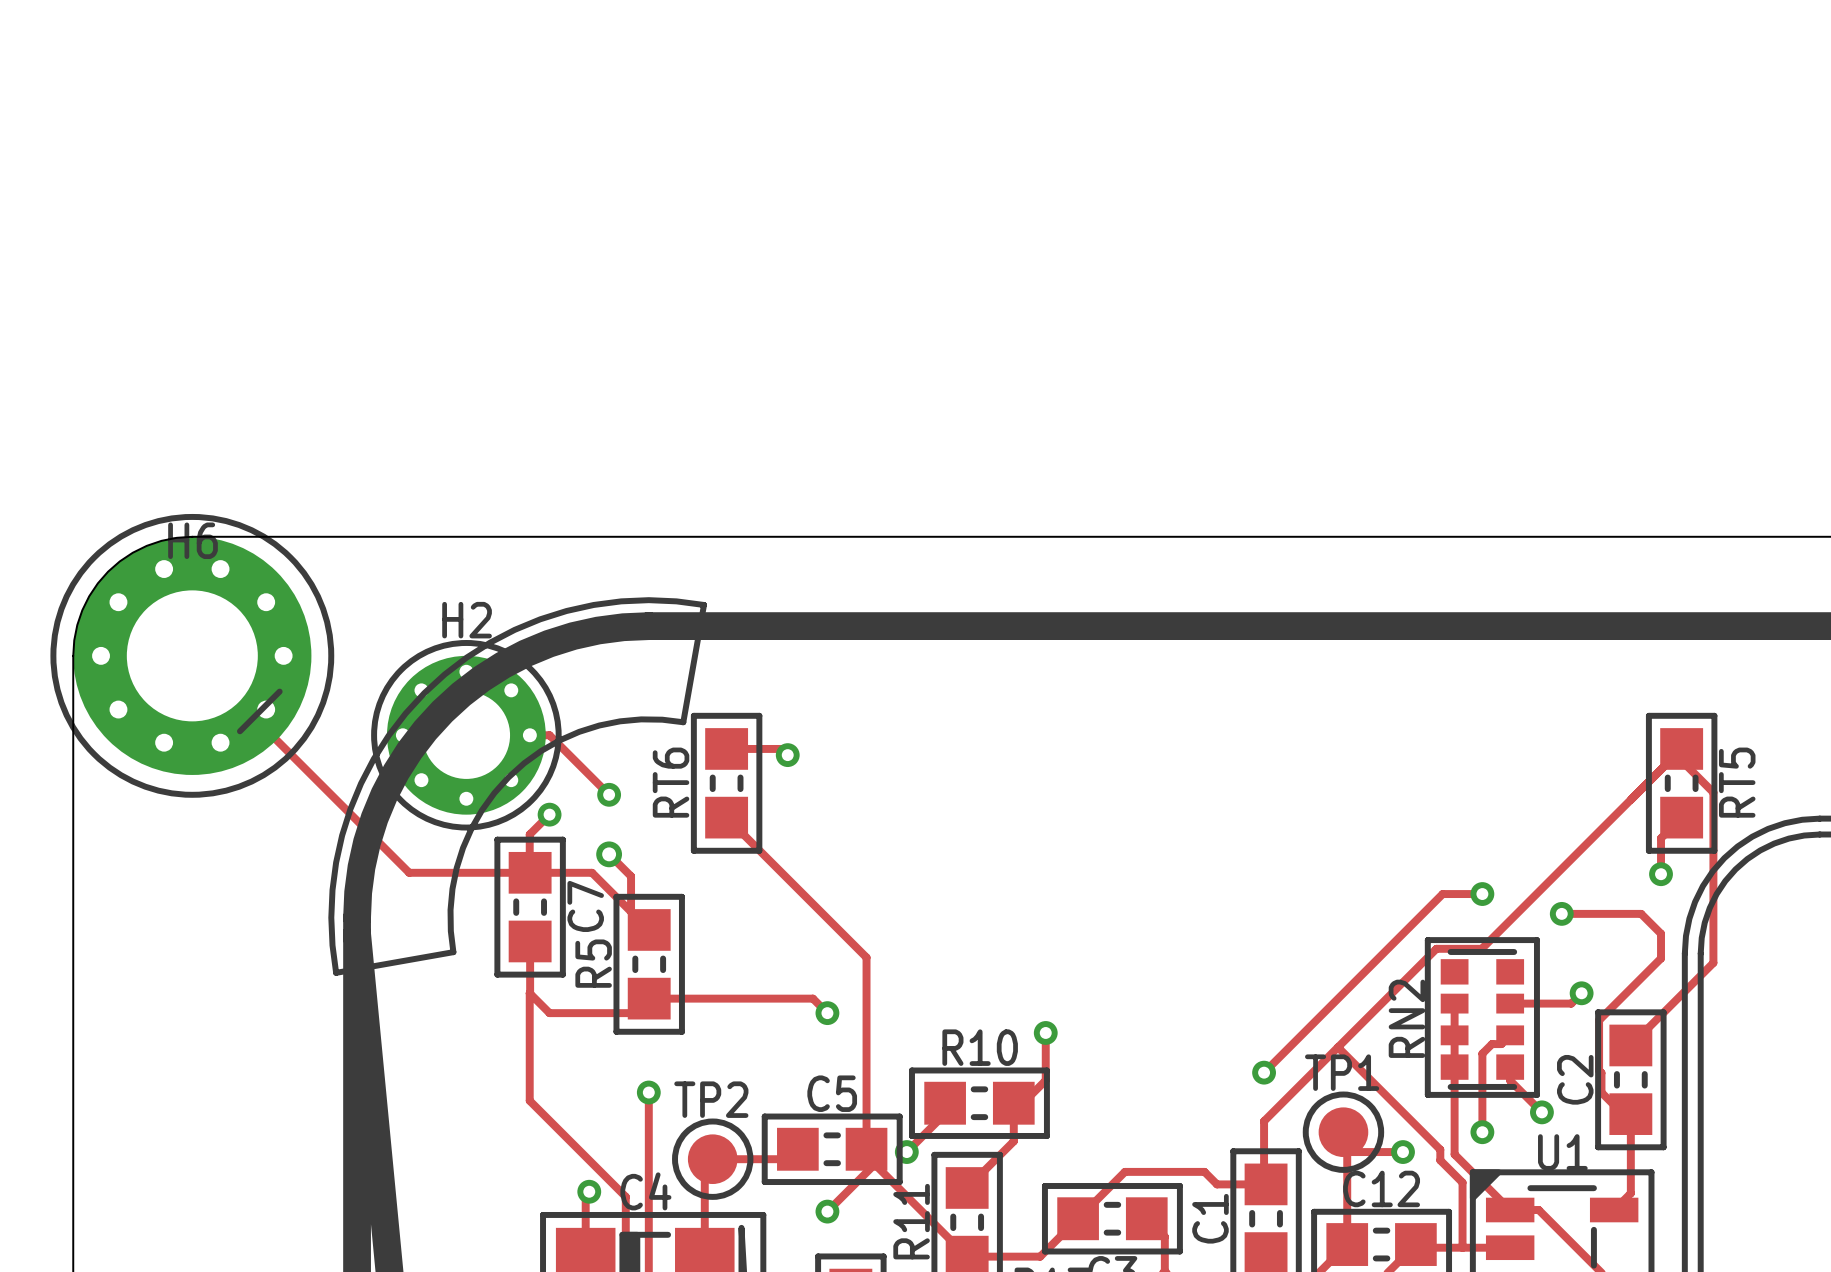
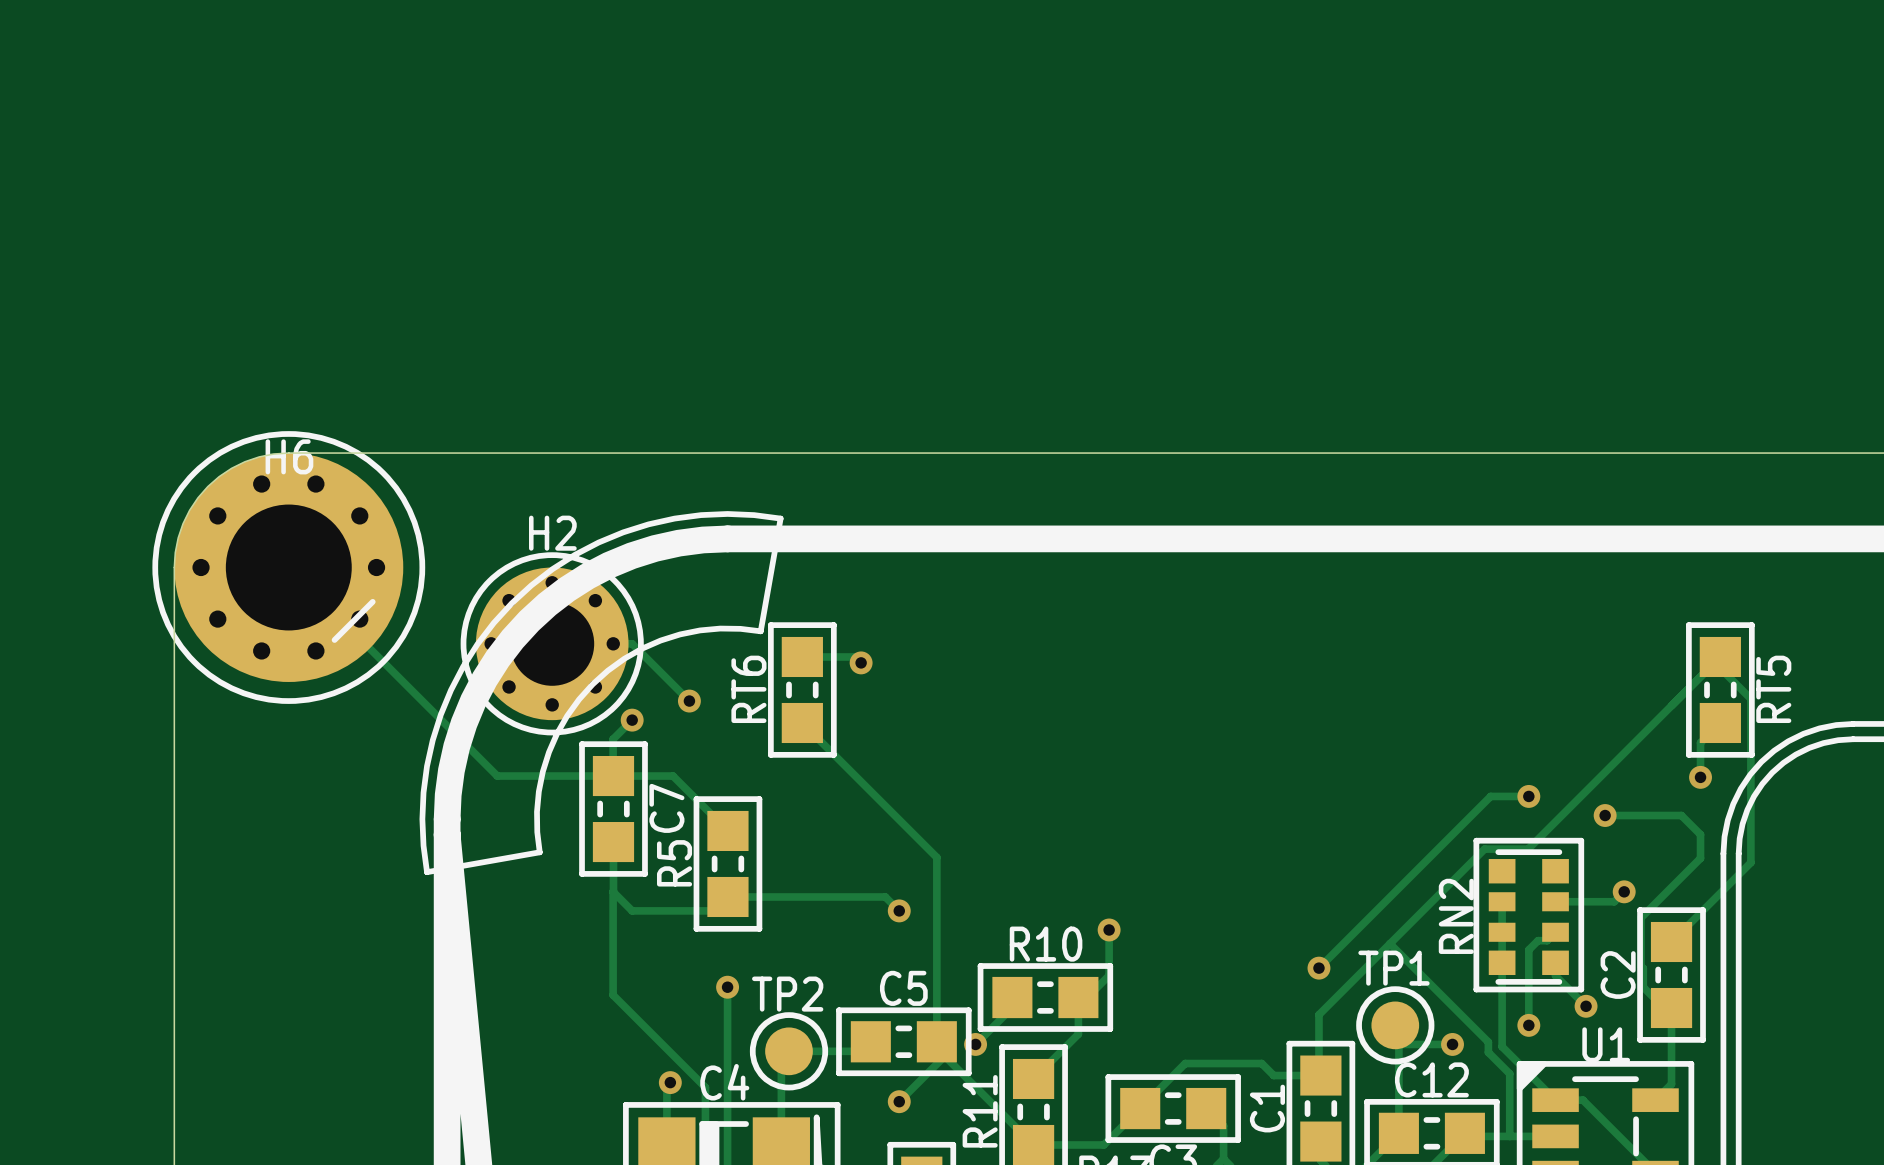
track: (609, 854) (631, 876) (631, 911) -> none
via: (609, 854) -> none

